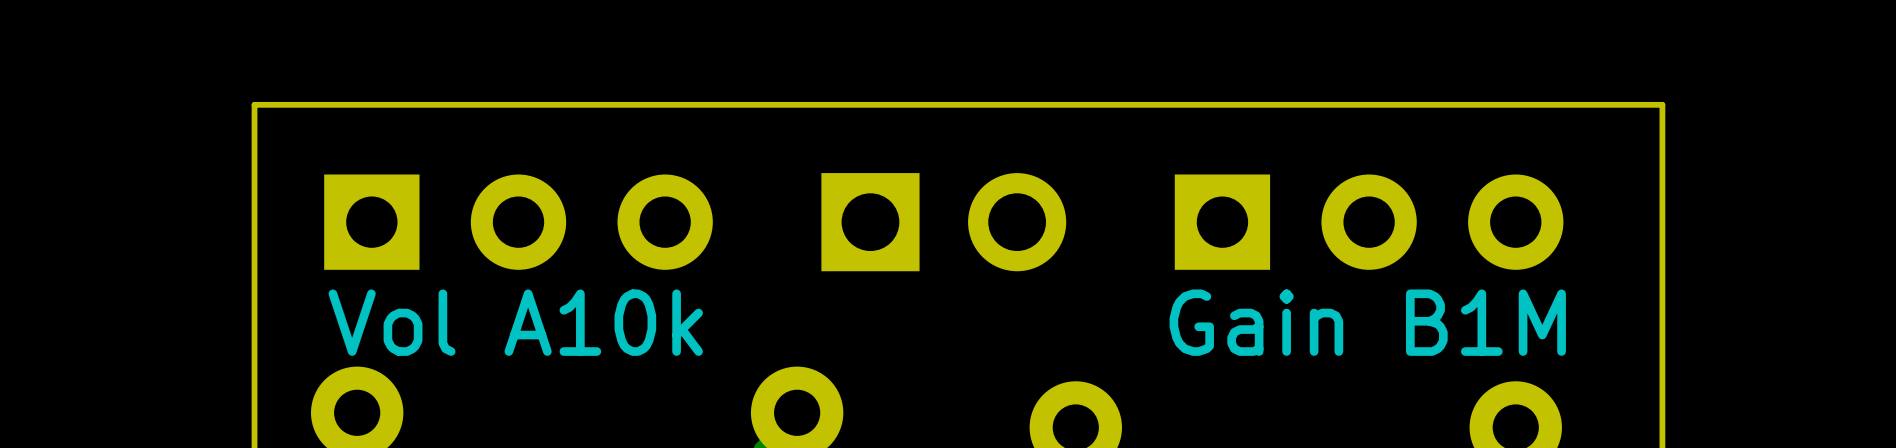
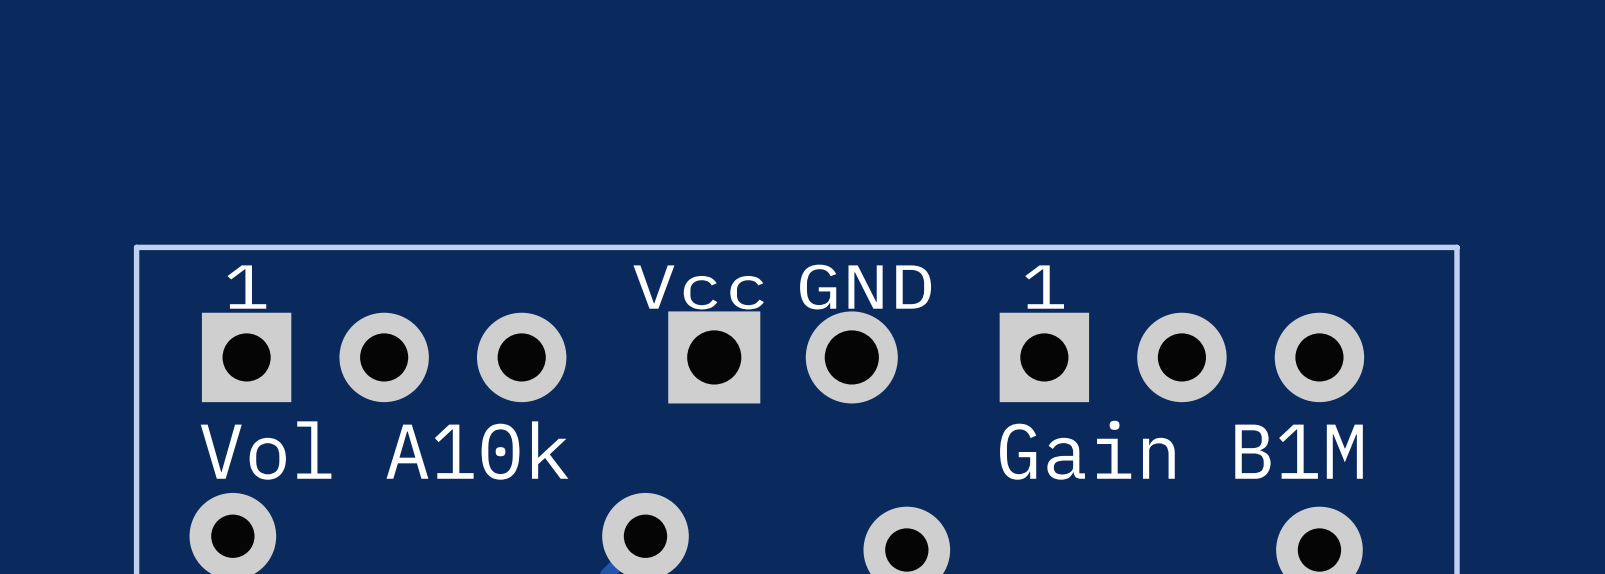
text: none -> 1 (246, 287)
text: none -> Vcc (698, 287)
text: none -> GND (865, 287)
text: none -> 1 (1044, 287)

